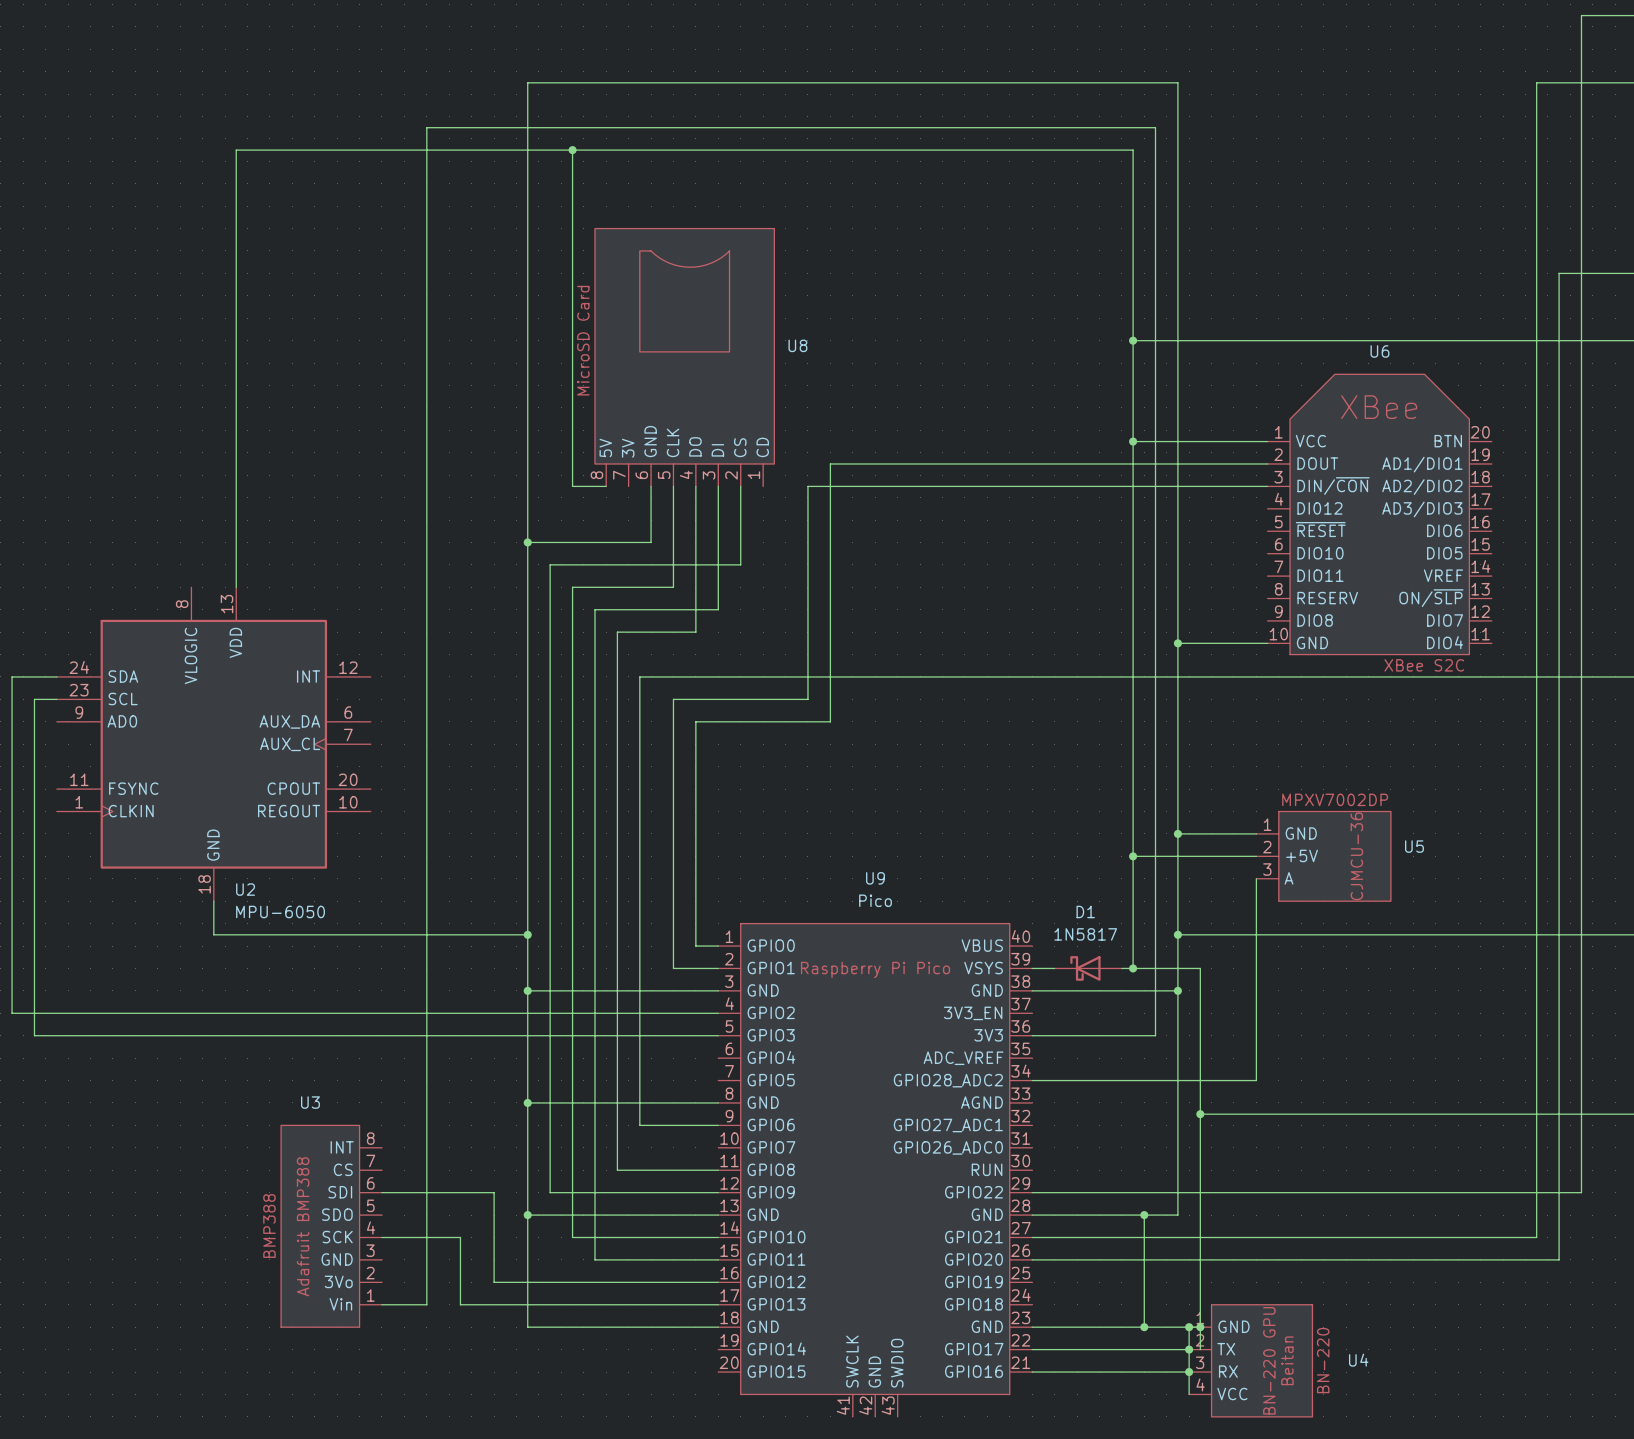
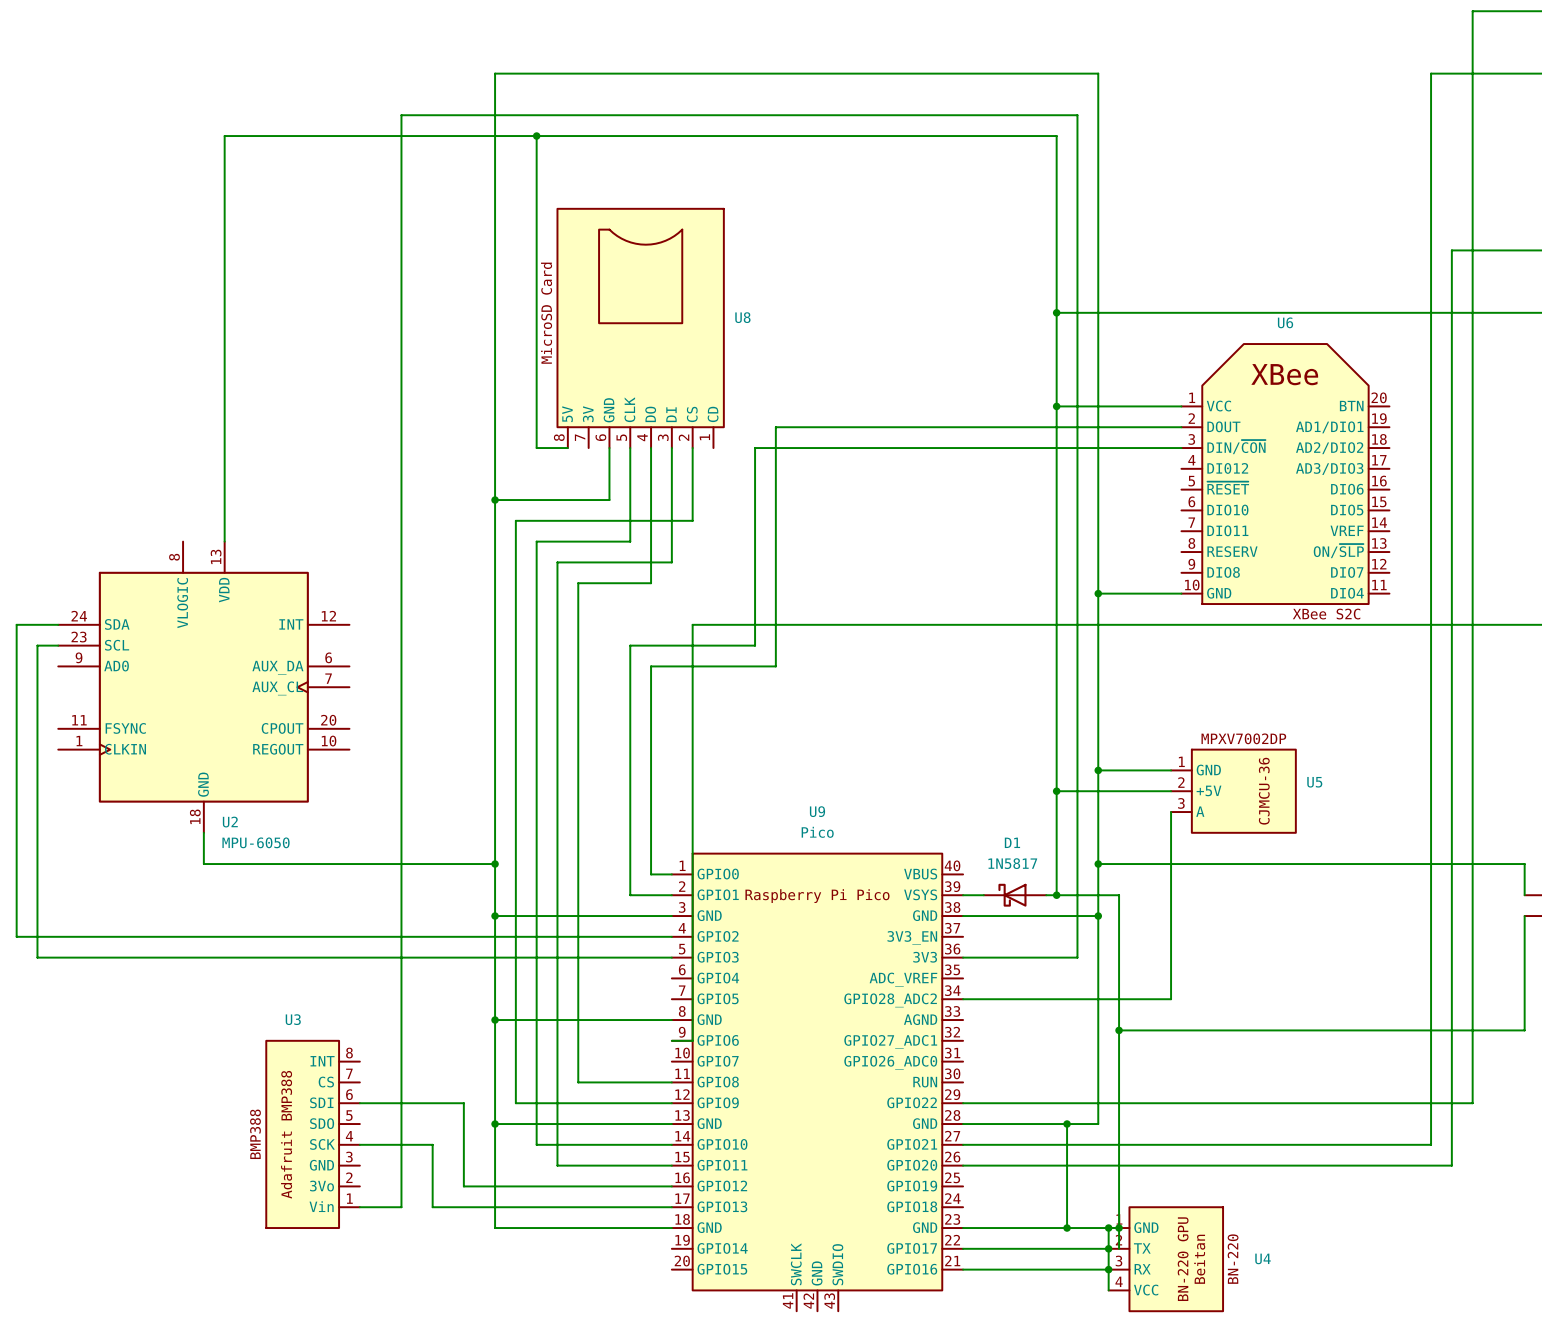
wire: (740, 676) (639, 676) (639, 1125) (718, 1125) -> (692, 624) (692, 1040) (671, 1040)

